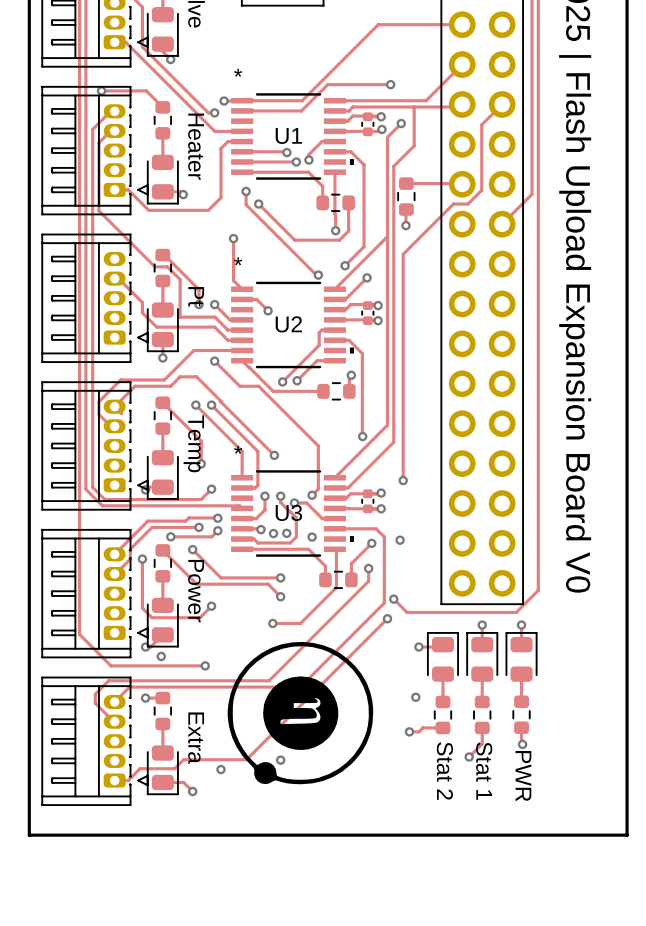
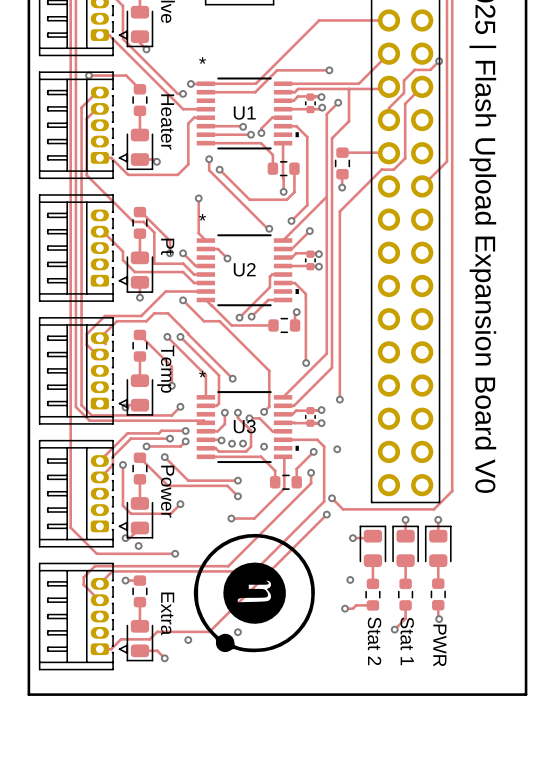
track: none -> (439, 61) (430, 69) (414, 69) (404, 80) (404, 93) (388, 108) (388, 120)
via: none -> (439, 61)

